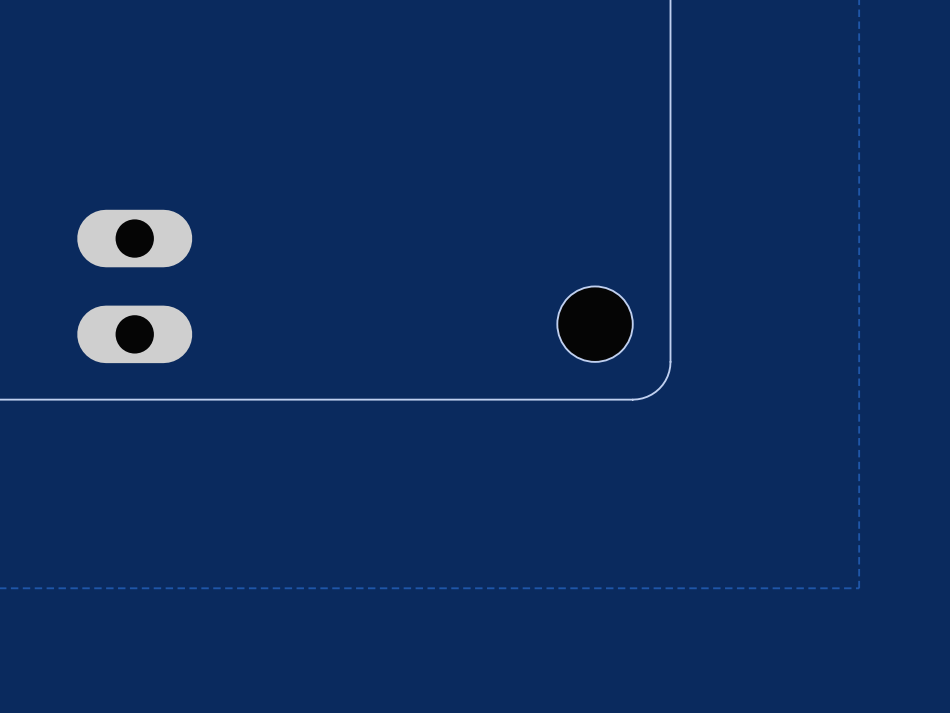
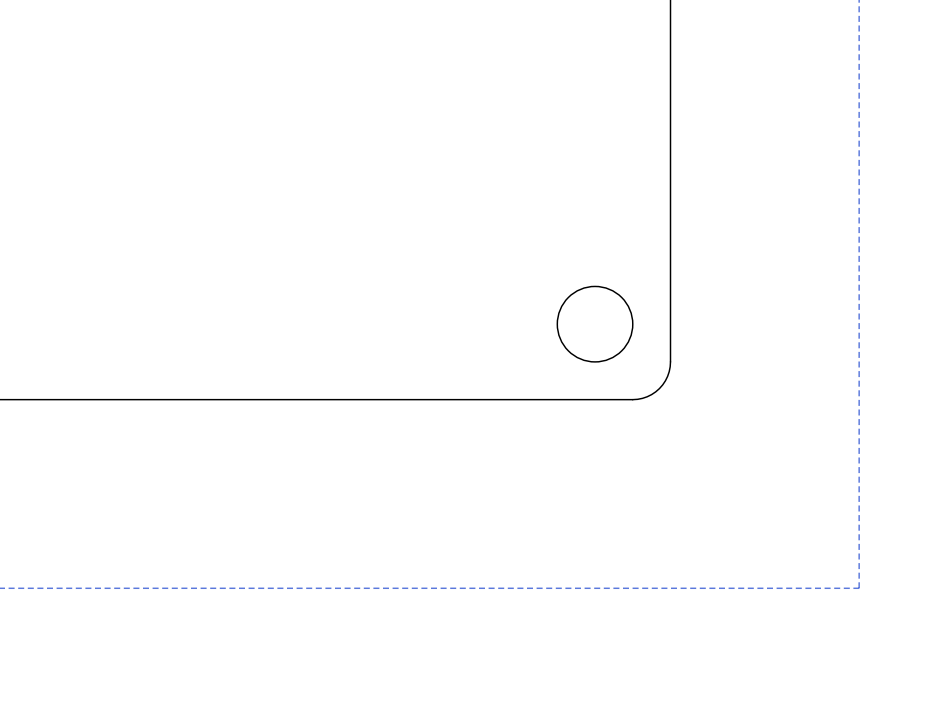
part: (134, 286) -> none

